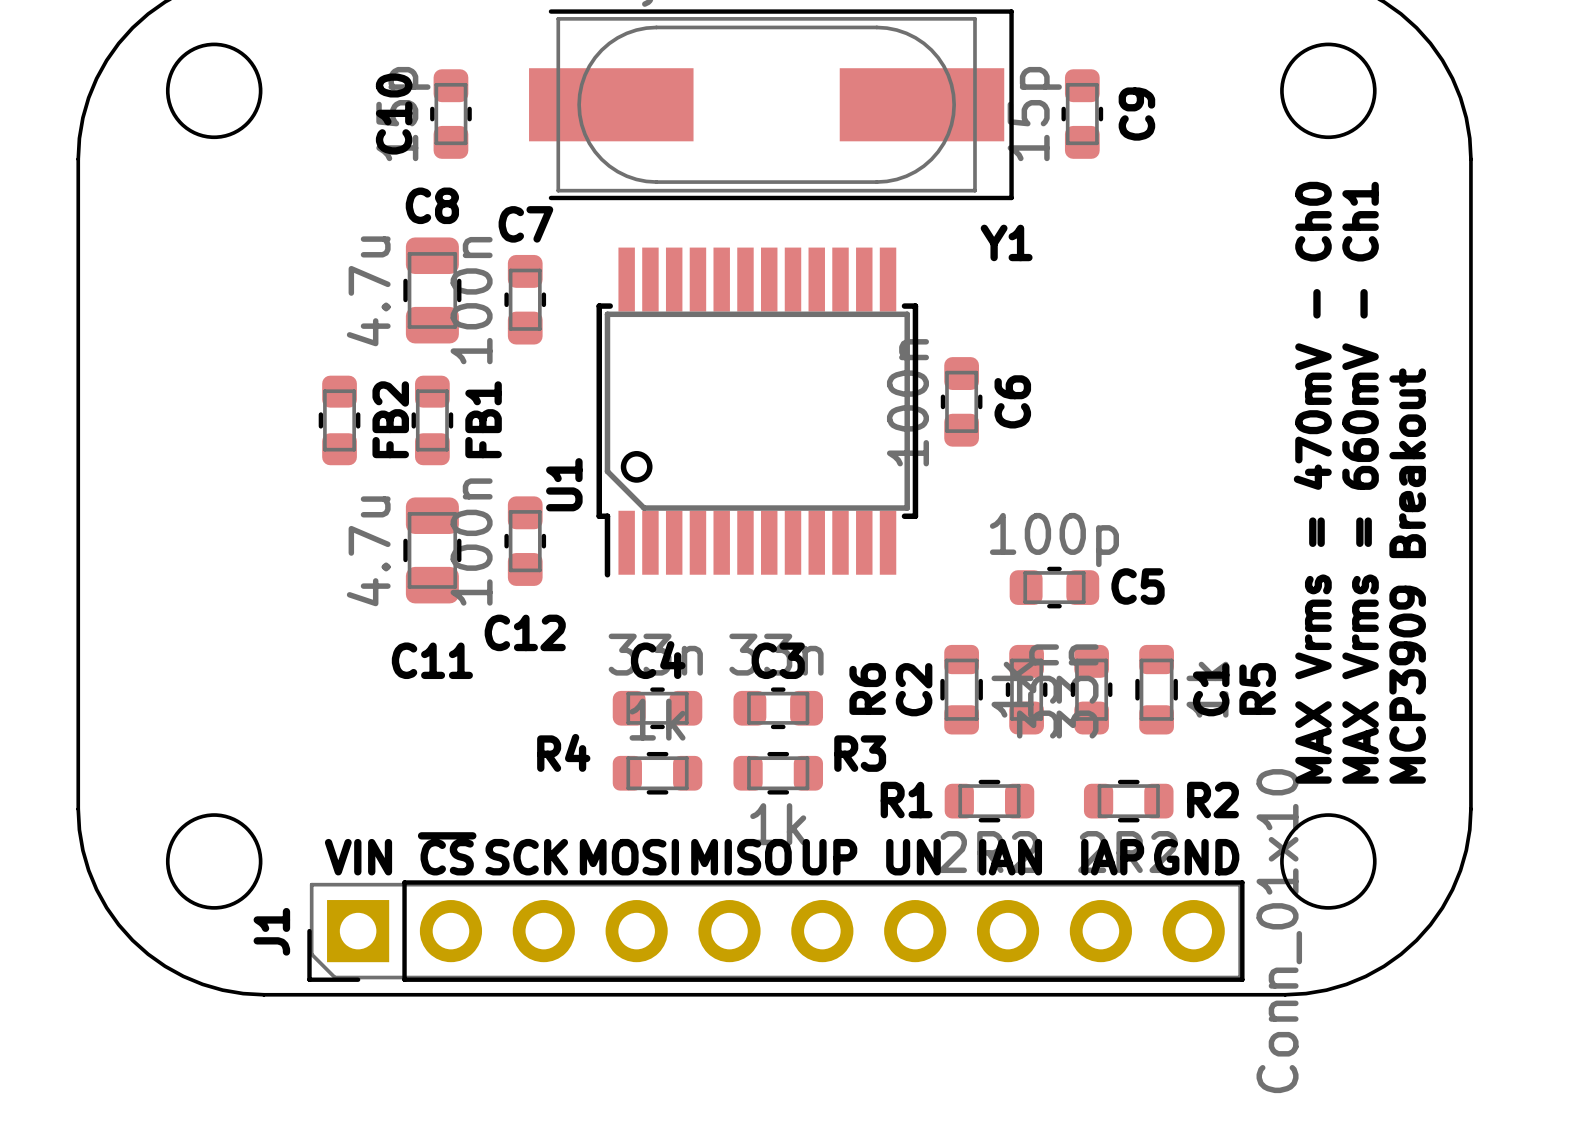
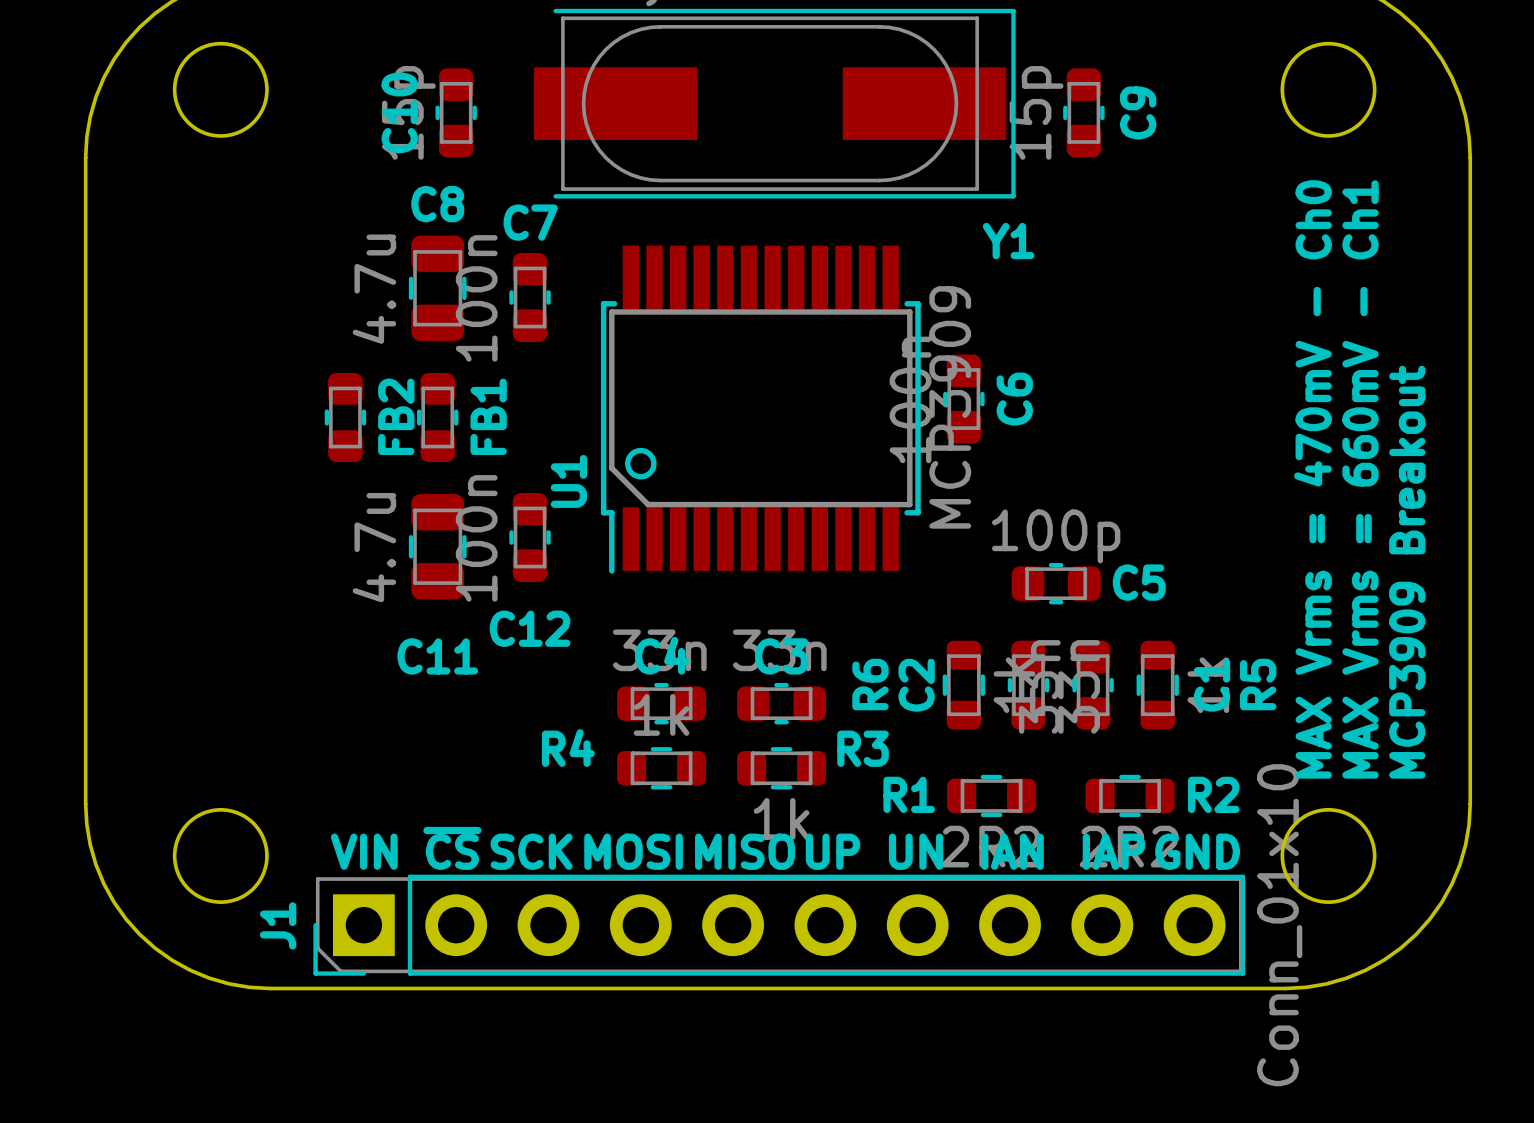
U1 value: none -> MCP3909 (950, 407)

